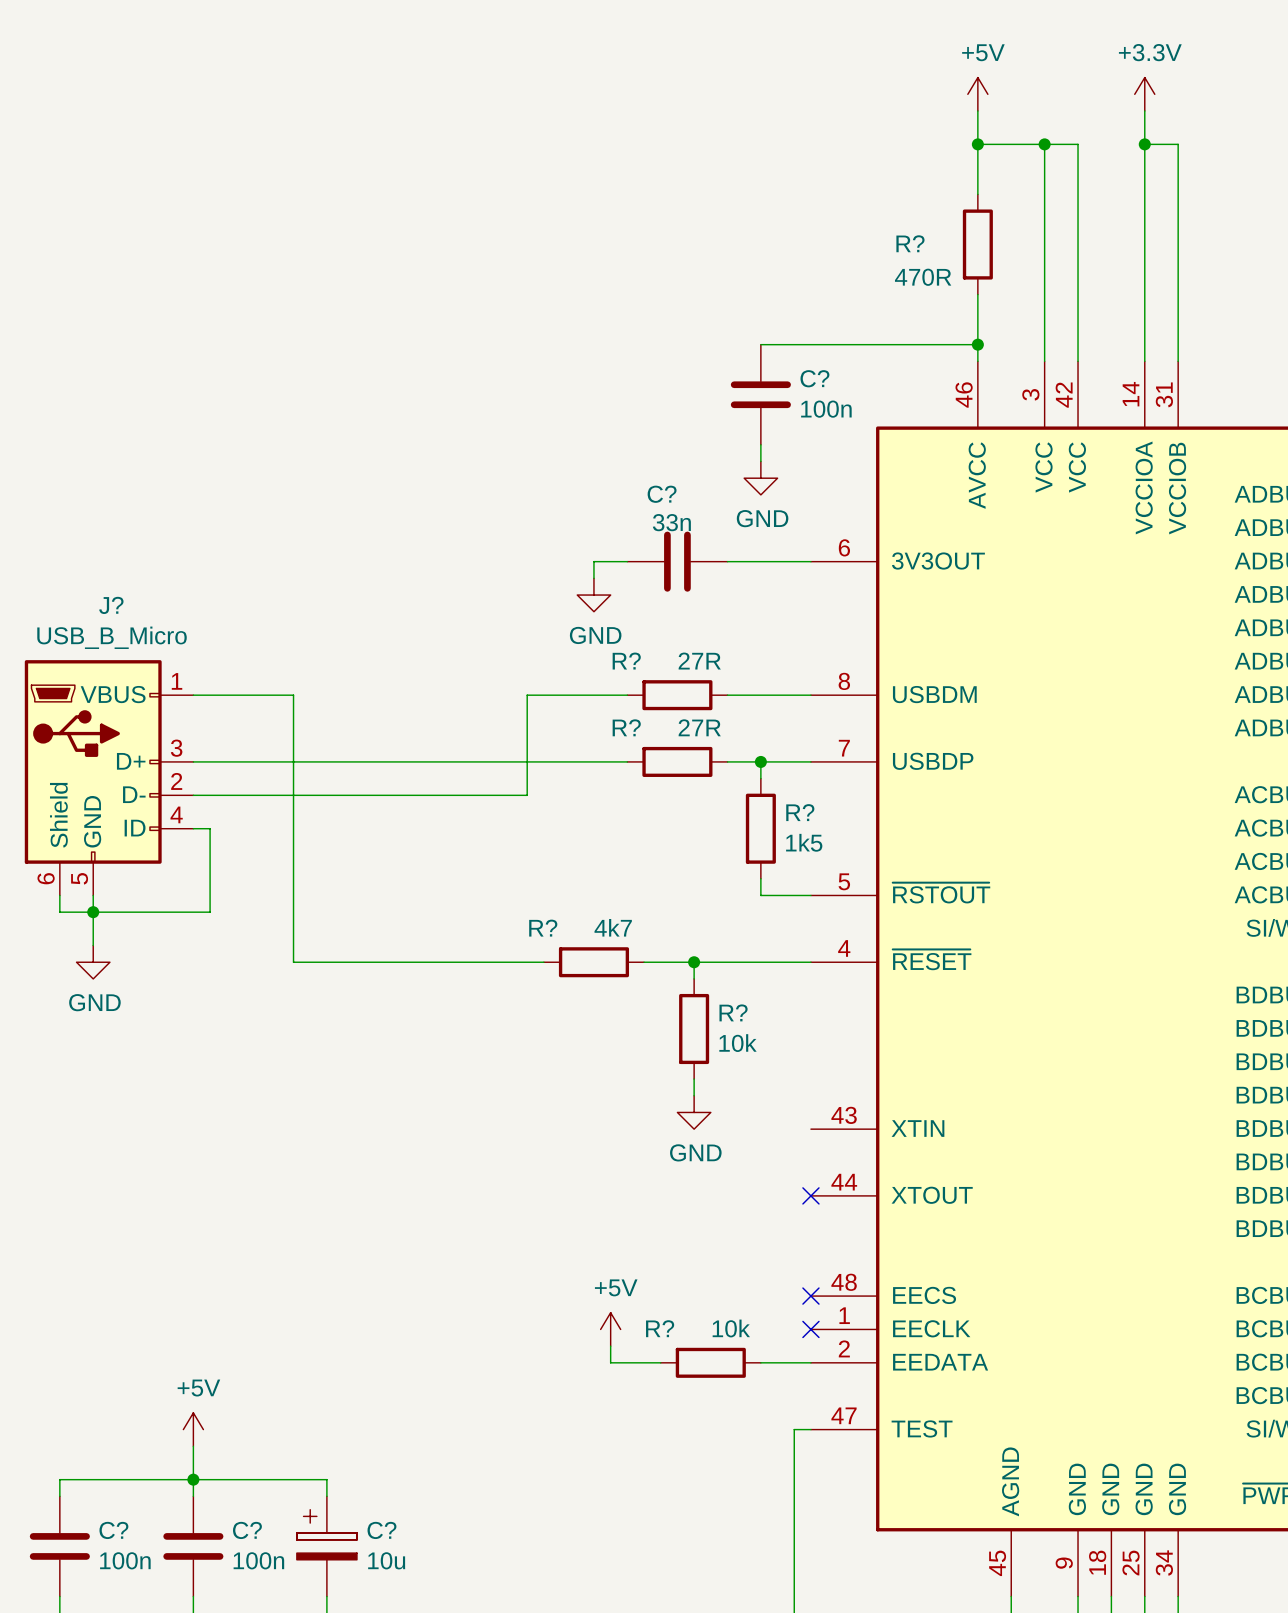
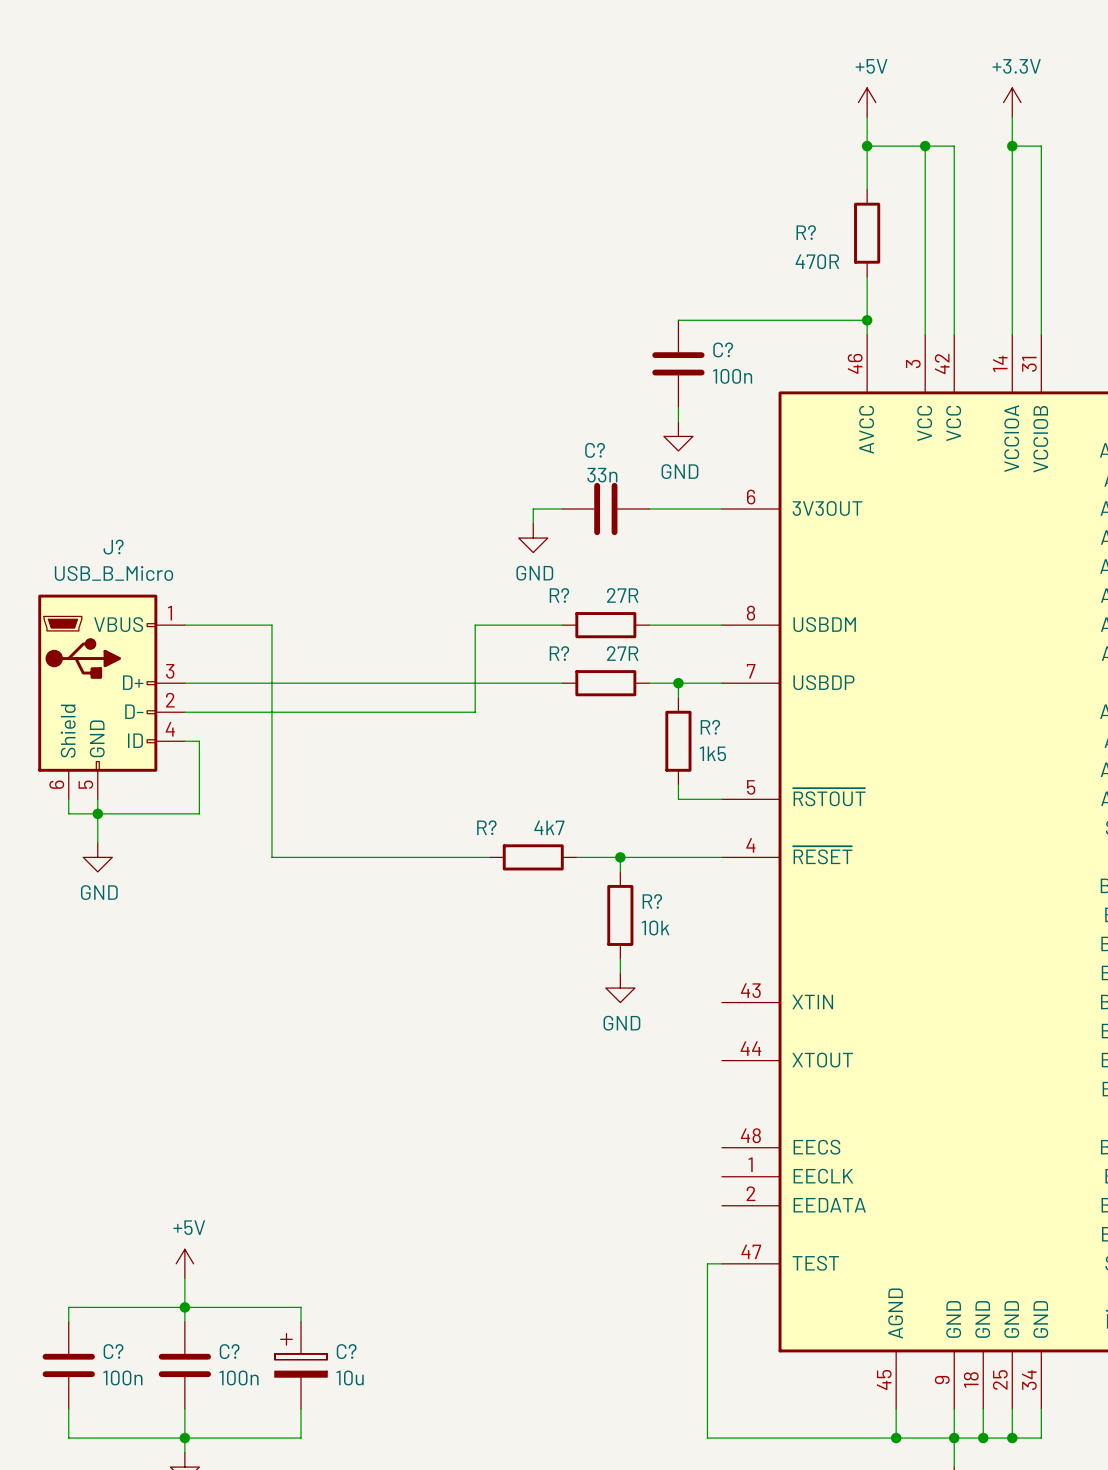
no-connect mark: (810, 1195) -> none
no-connect mark: (810, 1296) -> none
power symbol: +5V (610, 1329) -> none
no-connect mark: (810, 1329) -> none
wire: (610, 1346) (610, 1362) (660, 1362) -> none
R?: 10k (710, 1362) -> none
wire: (760, 1362) (810, 1362) -> none

